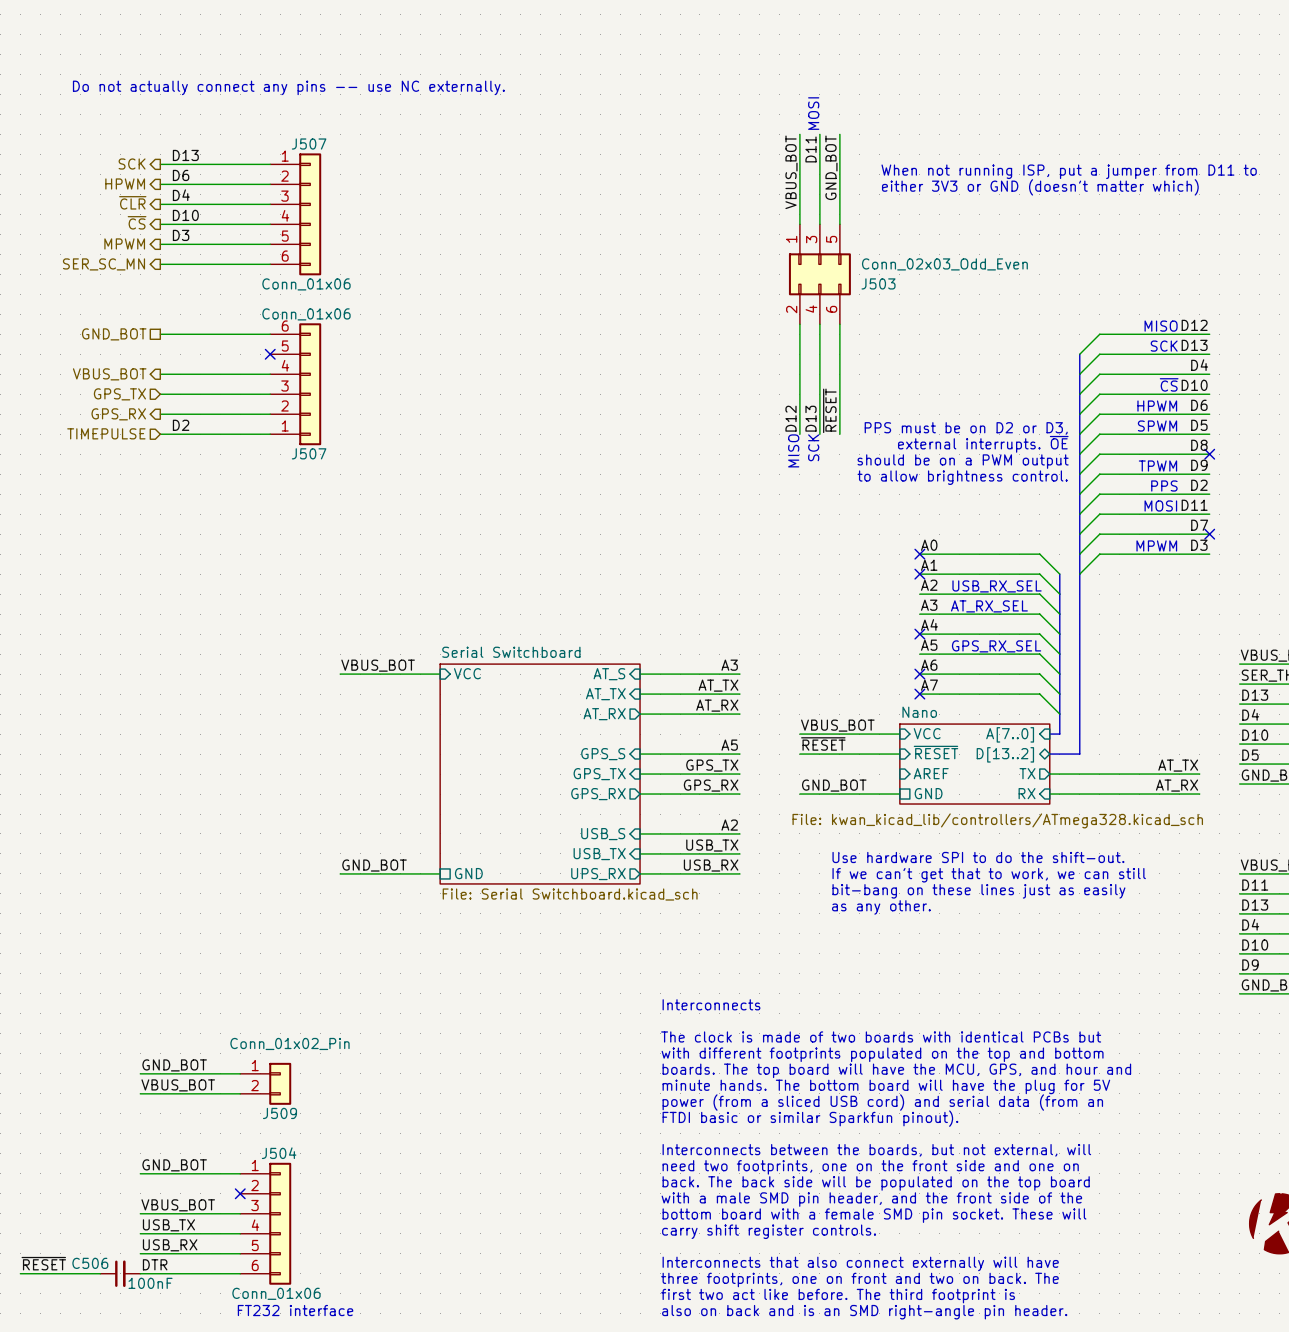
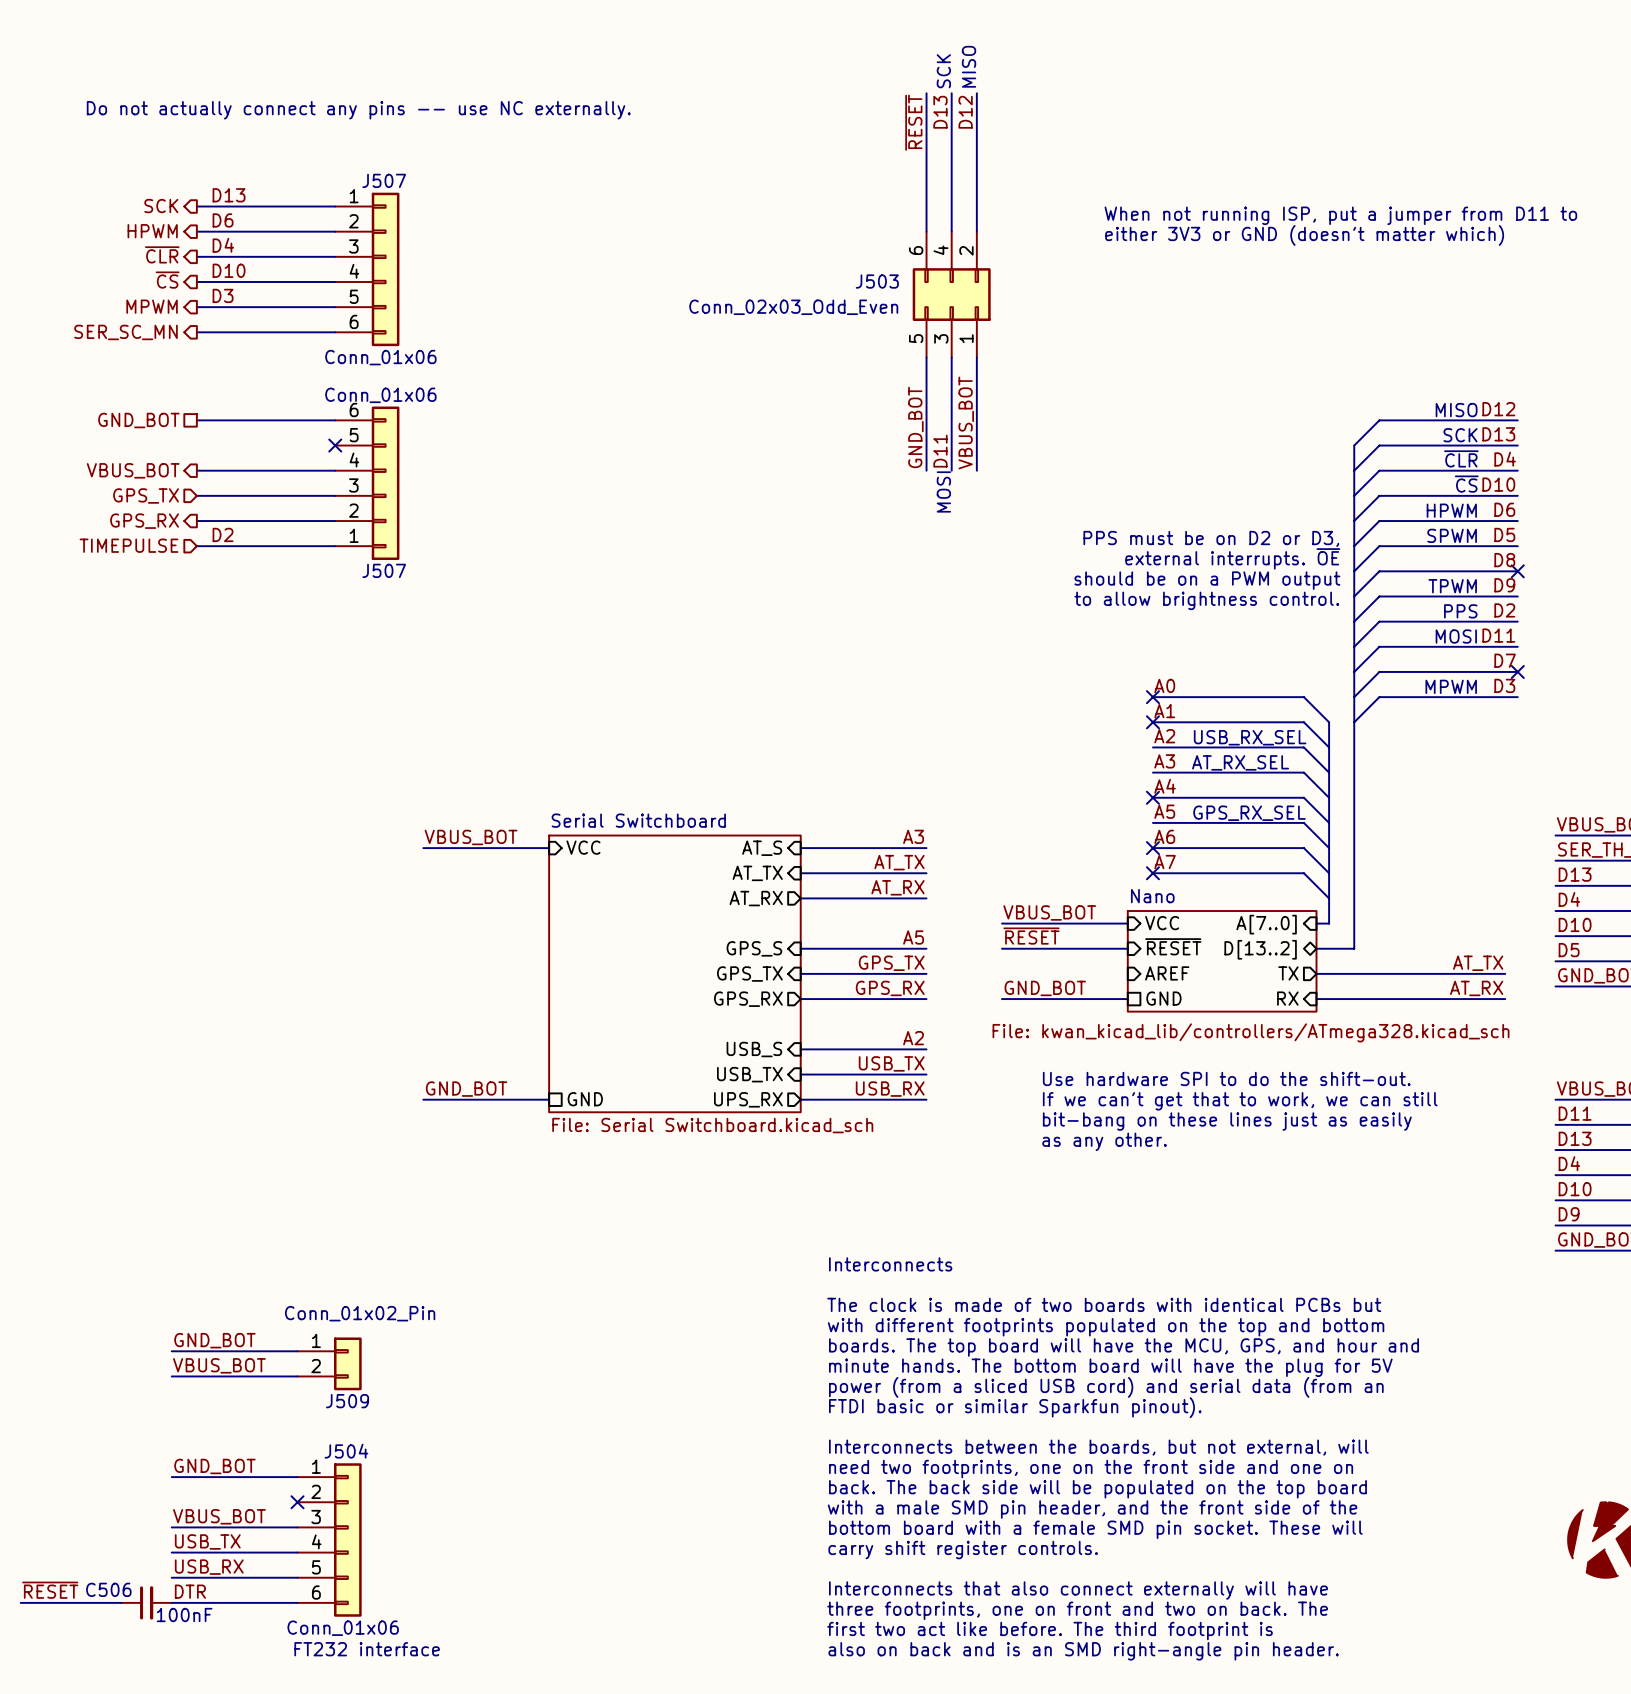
text: none -> MISO (969, 66)
text: none -> SCK (943, 71)
wire: none -> (926, 93) (926, 231)
wire: none -> (951, 93) (951, 231)
wire: none -> (976, 93) (976, 231)
label: none -> D13 (940, 112)
label: none -> D12 (965, 112)
label: none -> ~{RESET} (913, 122)
text: MOSI (813, 113) -> none
wire: (799, 134) (799, 224) -> (926, 357) (926, 470)
wire: (819, 134) (819, 224) -> (951, 357) (951, 470)
wire: (839, 134) (839, 224) -> (976, 357) (976, 470)
label: D11 (811, 149) -> none
label: GND_BOT (831, 167) -> none
label: VBUS_BOT (791, 172) -> none
J503 rotation: 0° (819, 274) -> 180° (951, 294)
J503 position: (819, 274) -> (951, 294)
wire: (799, 324) (799, 434) -> none
wire: (819, 324) (819, 434) -> none
wire: (839, 324) (839, 434) -> none
label: none -> VBUS_BOT (966, 422)
label: none -> GND_BOT (915, 427)
label: none -> D11 (940, 451)
text: none -> ~{CLR} (1461, 458)
text: none -> MOSI (943, 491)
label: ~{RESET} (829, 410) -> none
label: D12 (791, 418) -> none
label: D13 (811, 418) -> none
text: SCK (813, 447) -> none
text: MISO (793, 450) -> none

